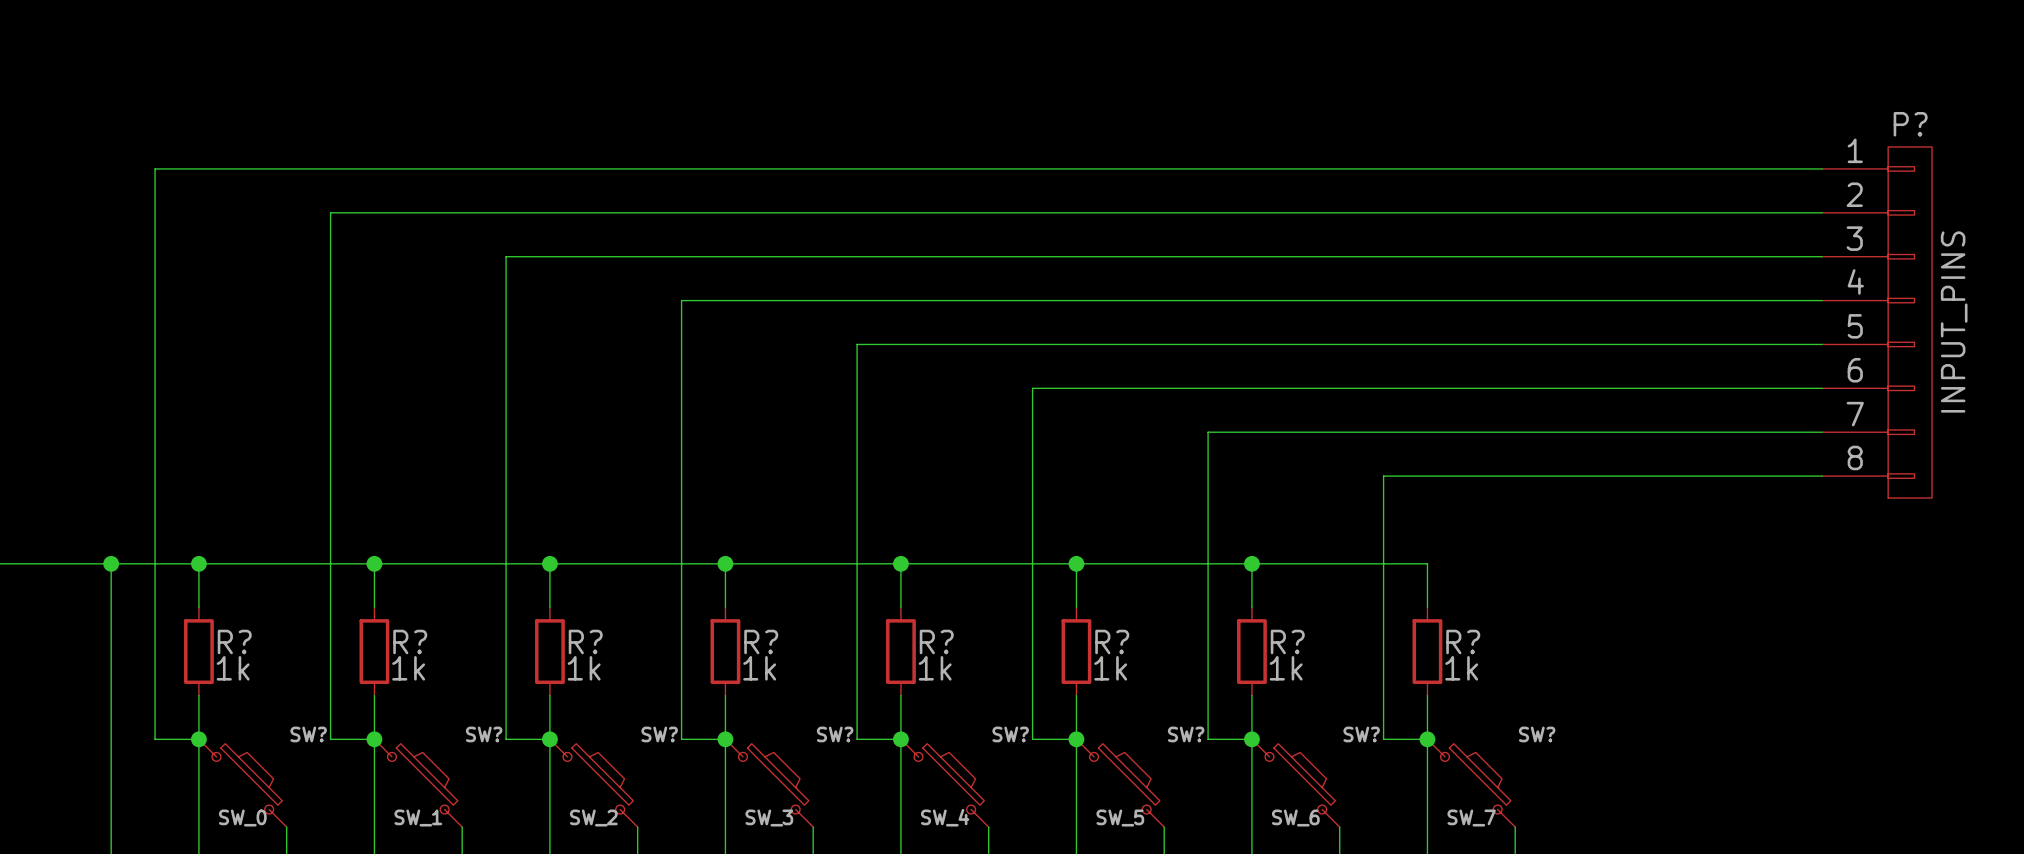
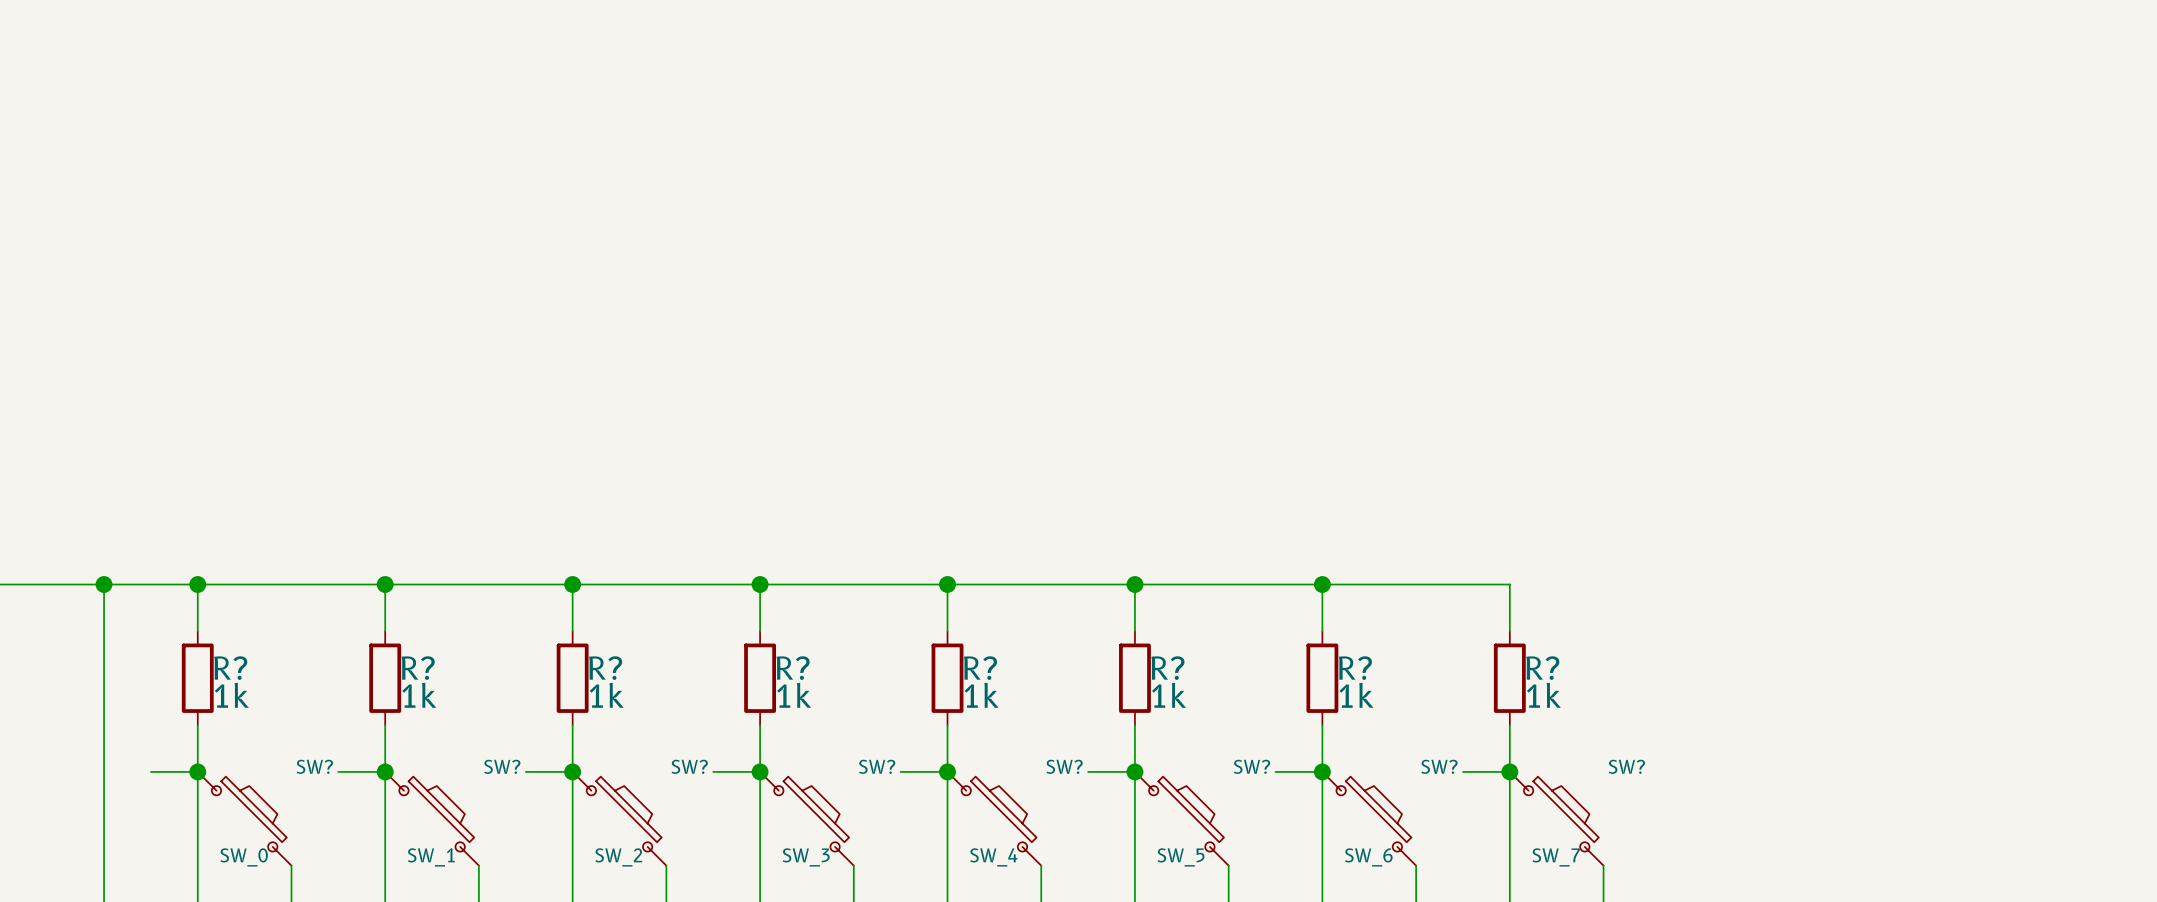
wire: (1822, 168) (155, 168) (155, 739) -> none
wire: (1822, 212) (330, 212) (330, 739) -> none
wire: (1822, 256) (506, 256) (506, 739) -> none
wire: (1822, 300) (681, 300) (681, 739) -> none
P?: INPUT_PINS (1877, 322) -> none
wire: (1822, 344) (857, 344) (857, 739) -> none
wire: (1822, 388) (1032, 388) (1032, 739) -> none
wire: (1822, 432) (1208, 432) (1208, 739) -> none
wire: (1822, 476) (1383, 476) (1383, 739) -> none

